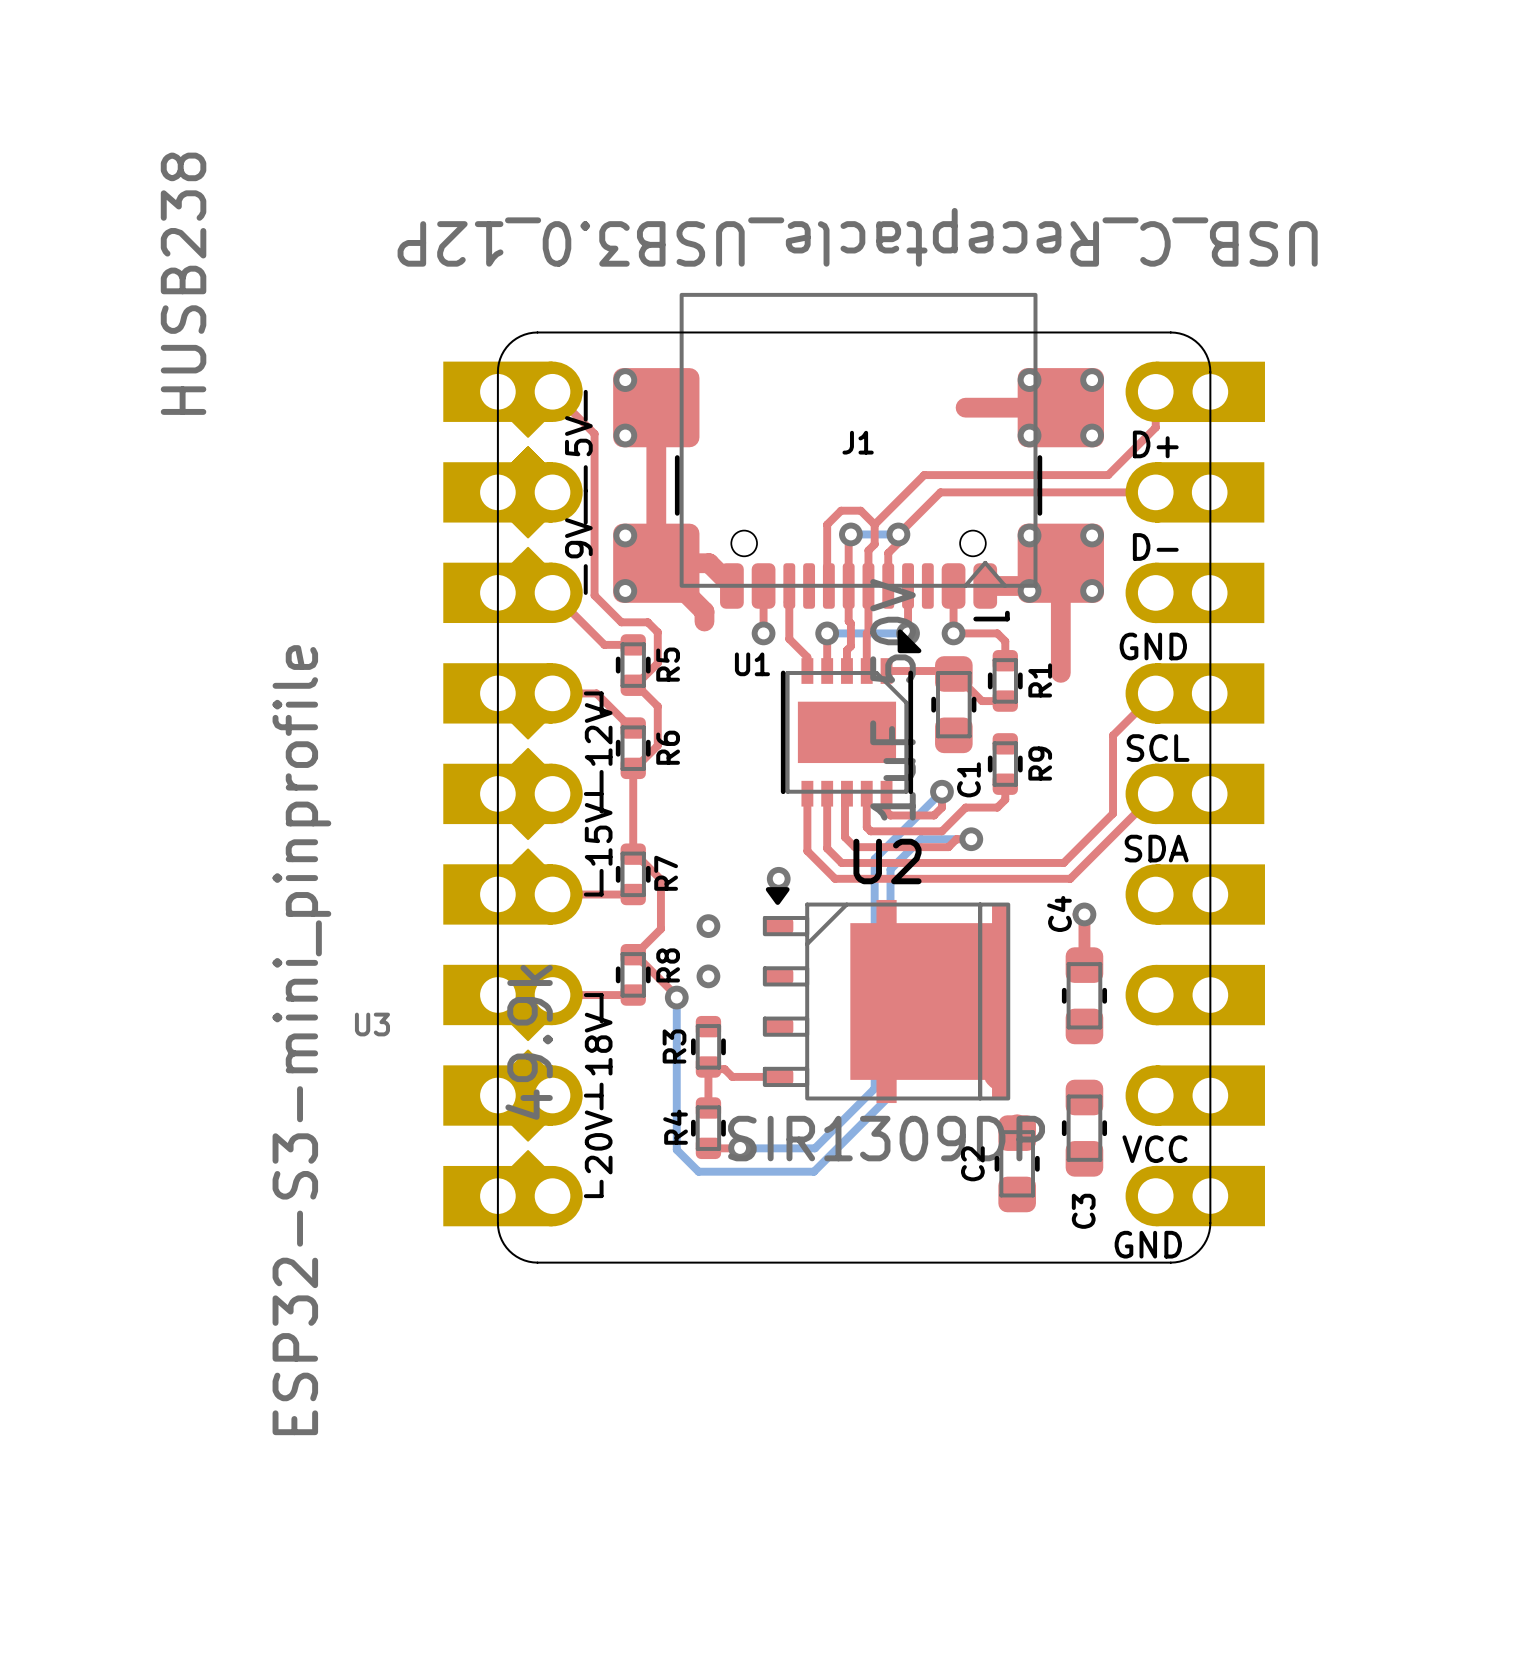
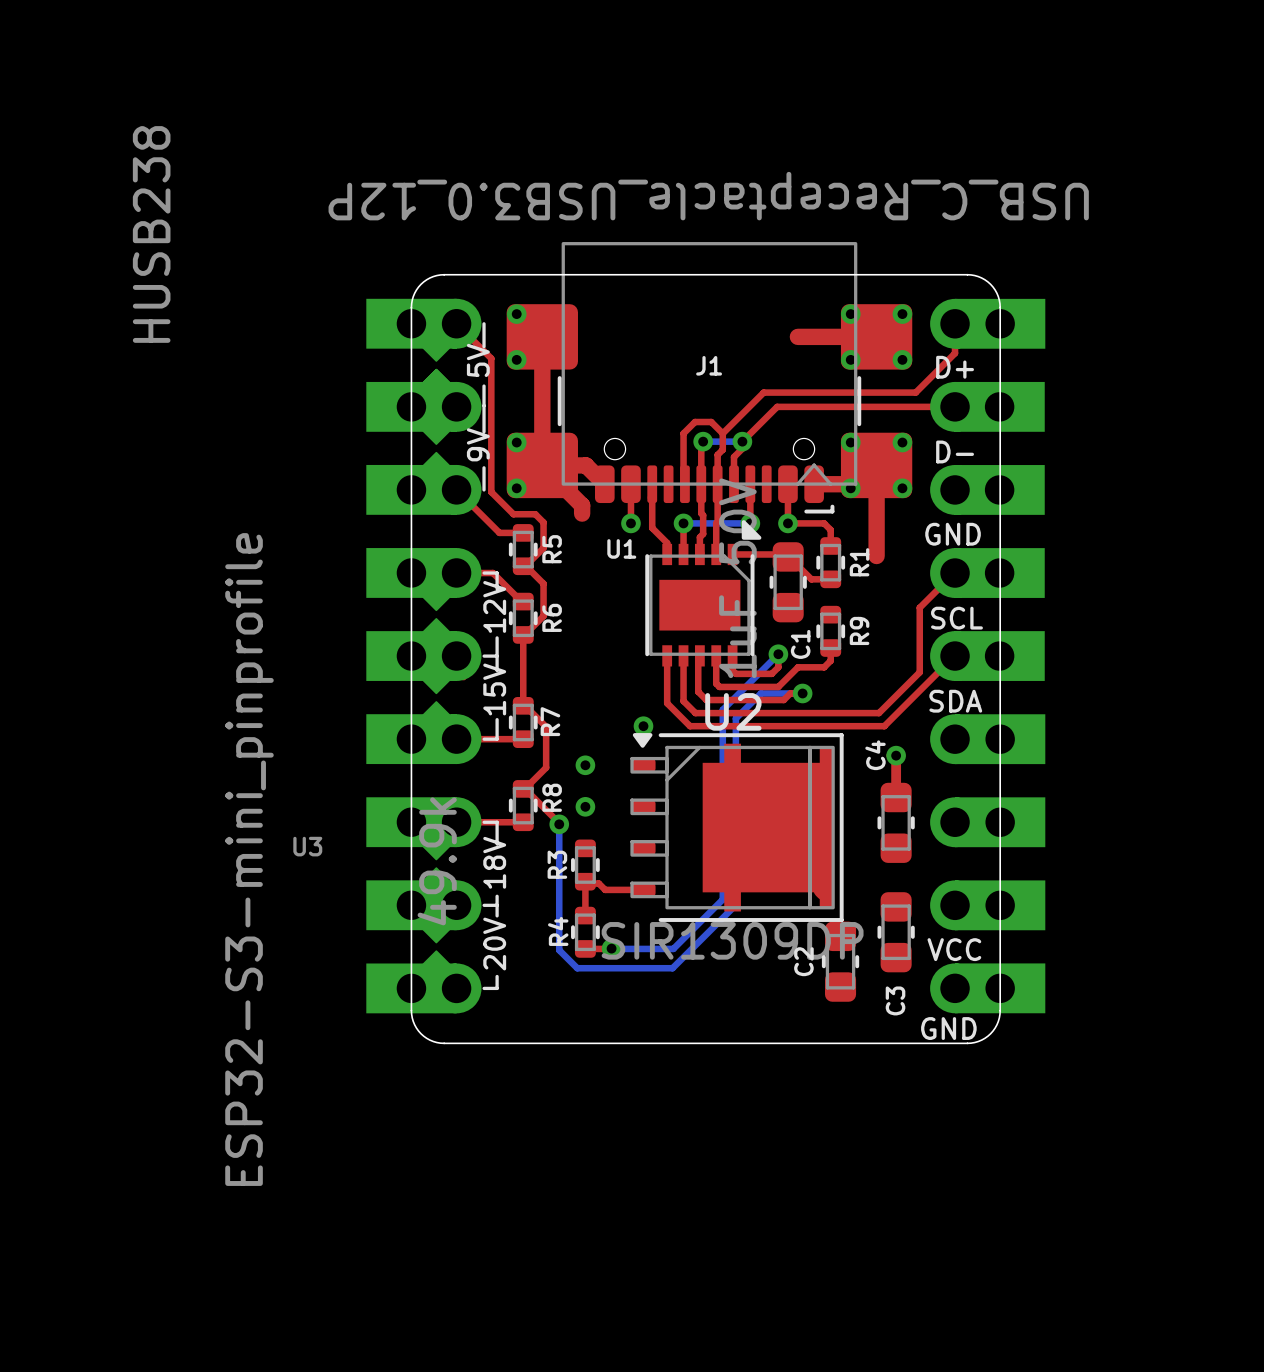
U2 footprint: [762, 887, 1011, 1104] -> [630, 733, 844, 922]

